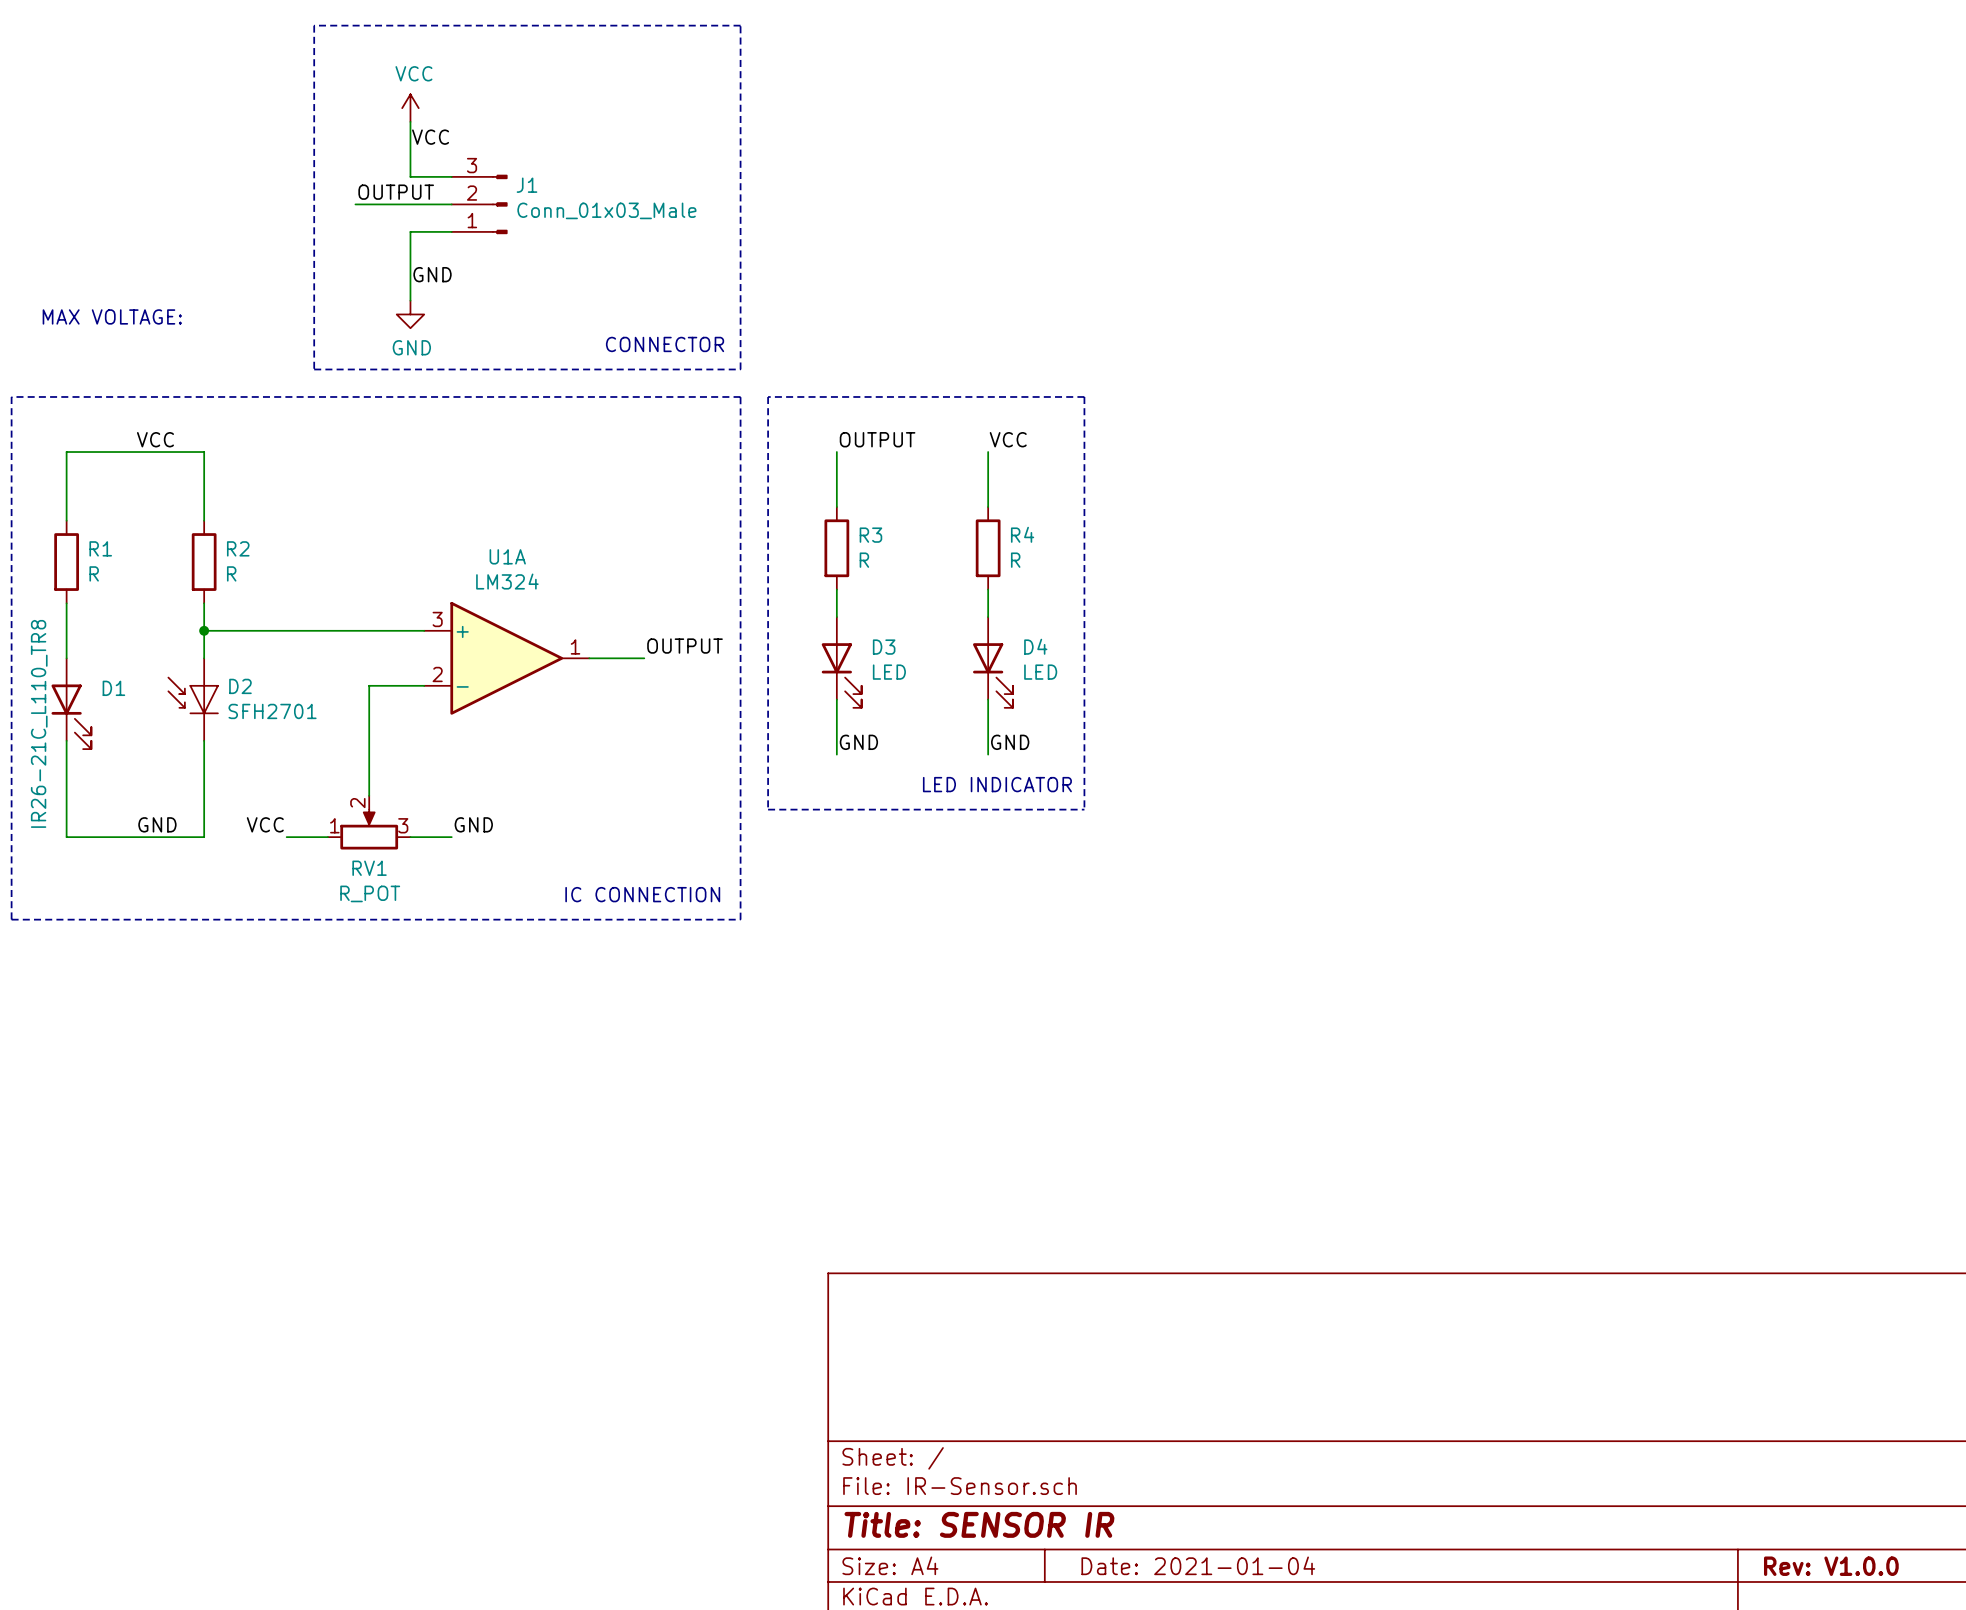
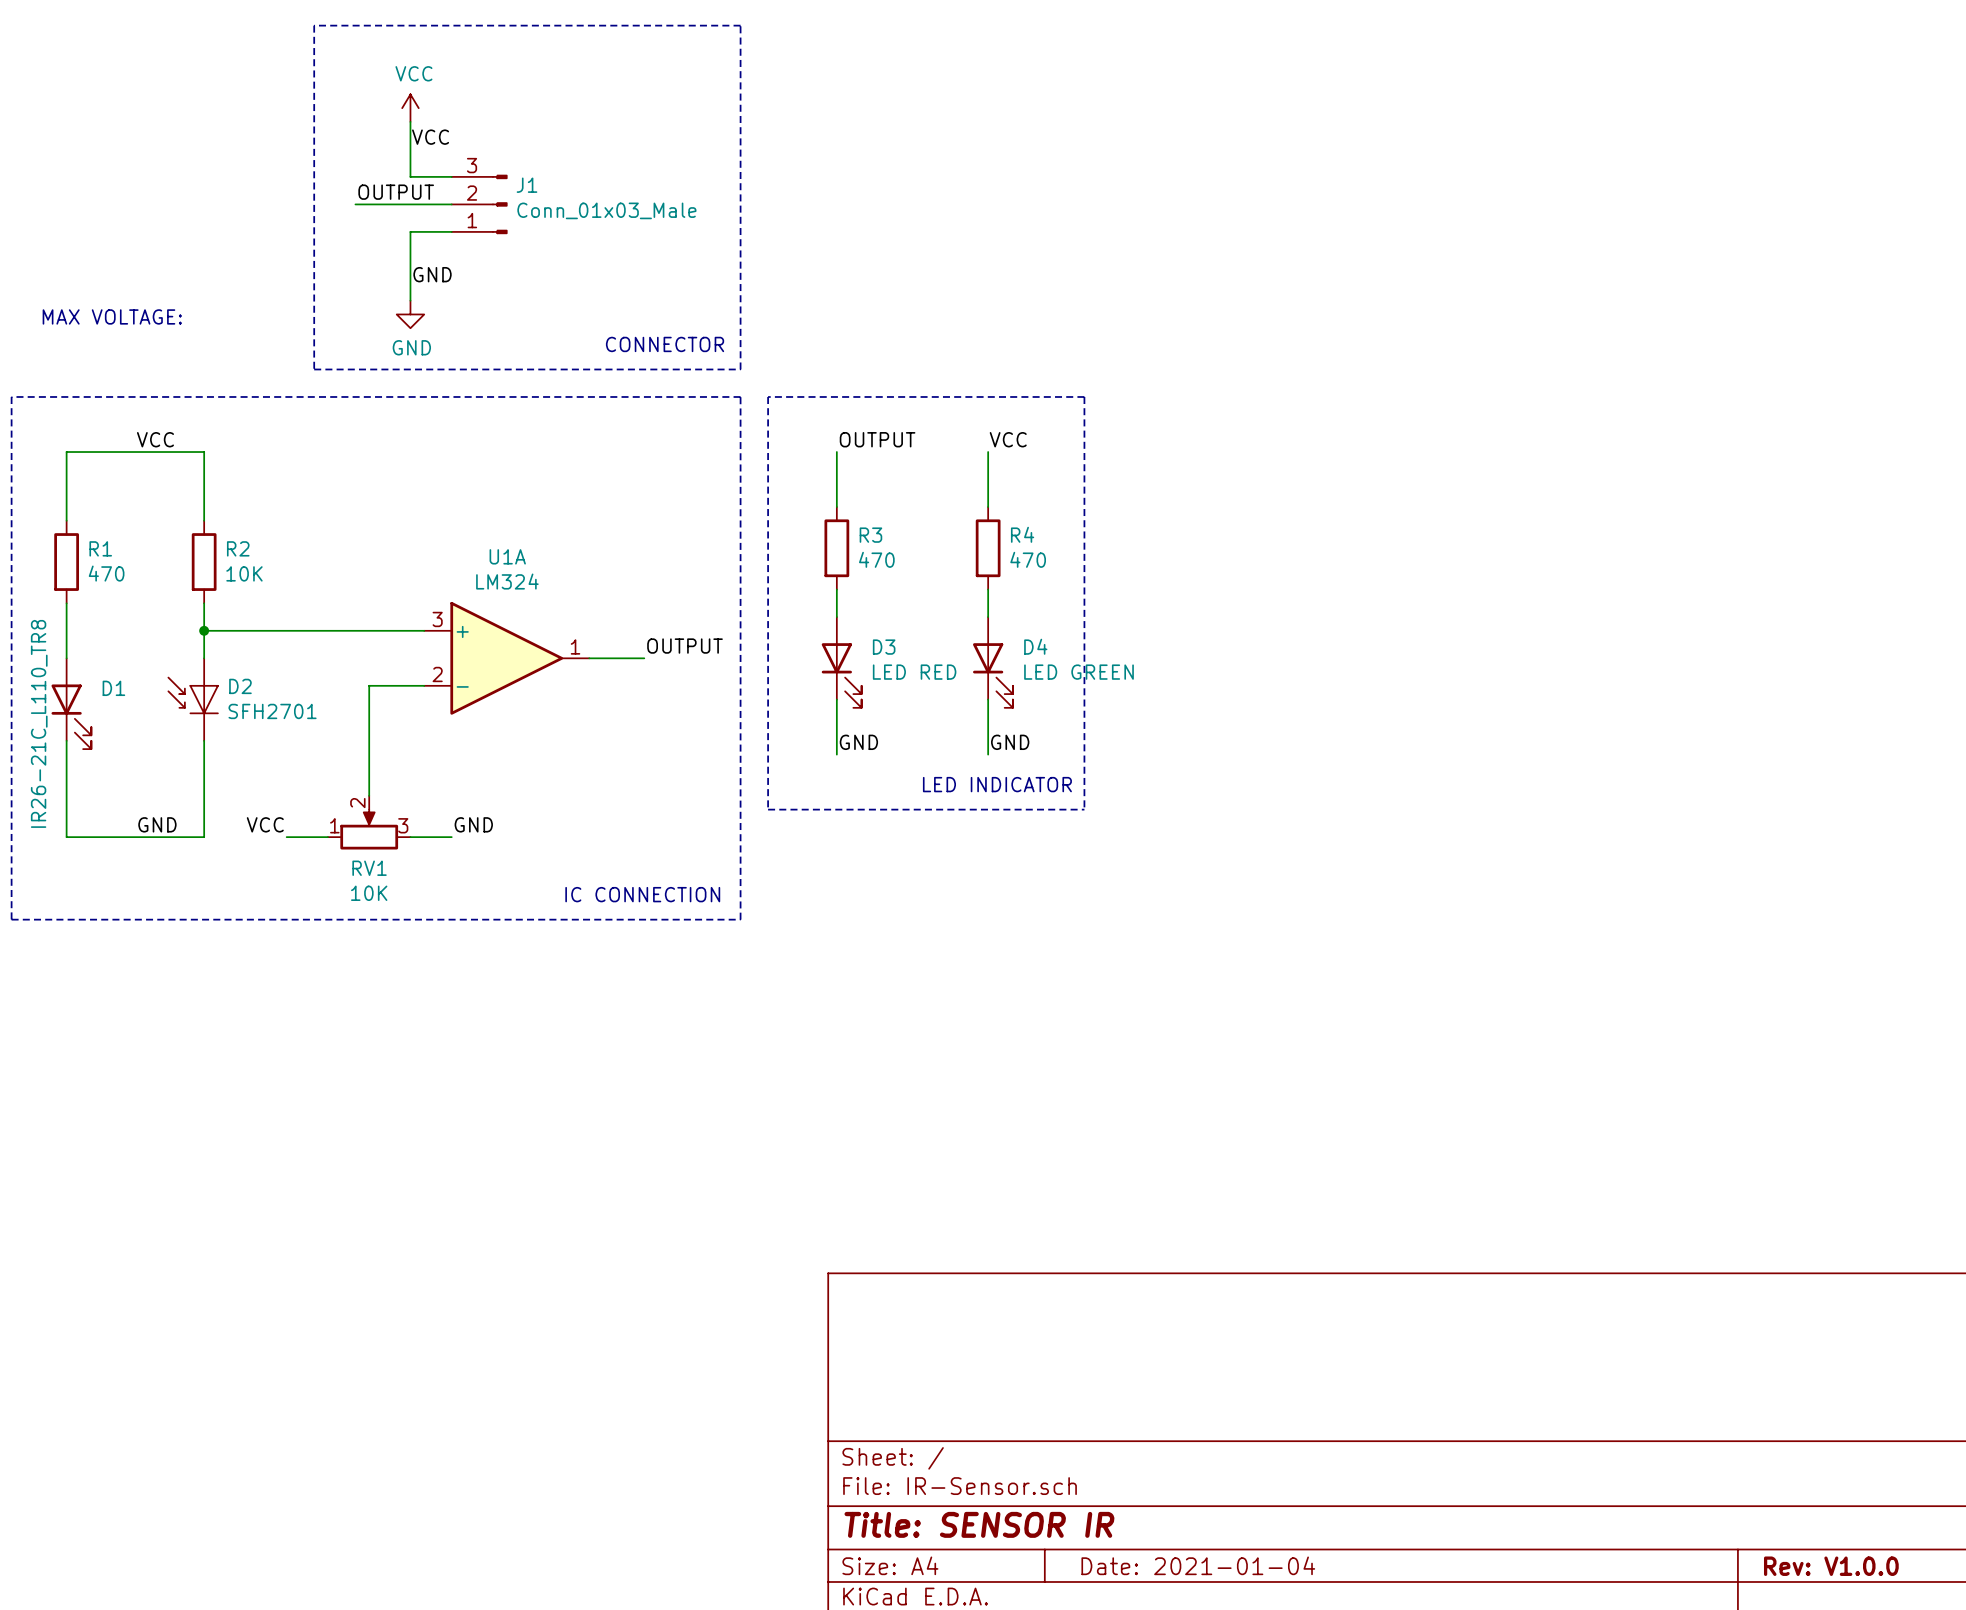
R3 value: R (864, 560) -> 470 (876, 559)
R4 value: R (1015, 560) -> 470 (1028, 559)
R1 value: R (94, 573) -> 470 (106, 573)
R2 value: R (231, 573) -> 10K (244, 573)
D3 value: LED (889, 672) -> LED RED (914, 672)
D4 value: LED (1040, 672) -> LED GREEN (1079, 672)
RV1 value: R_POT (370, 893) -> 10K (369, 893)

